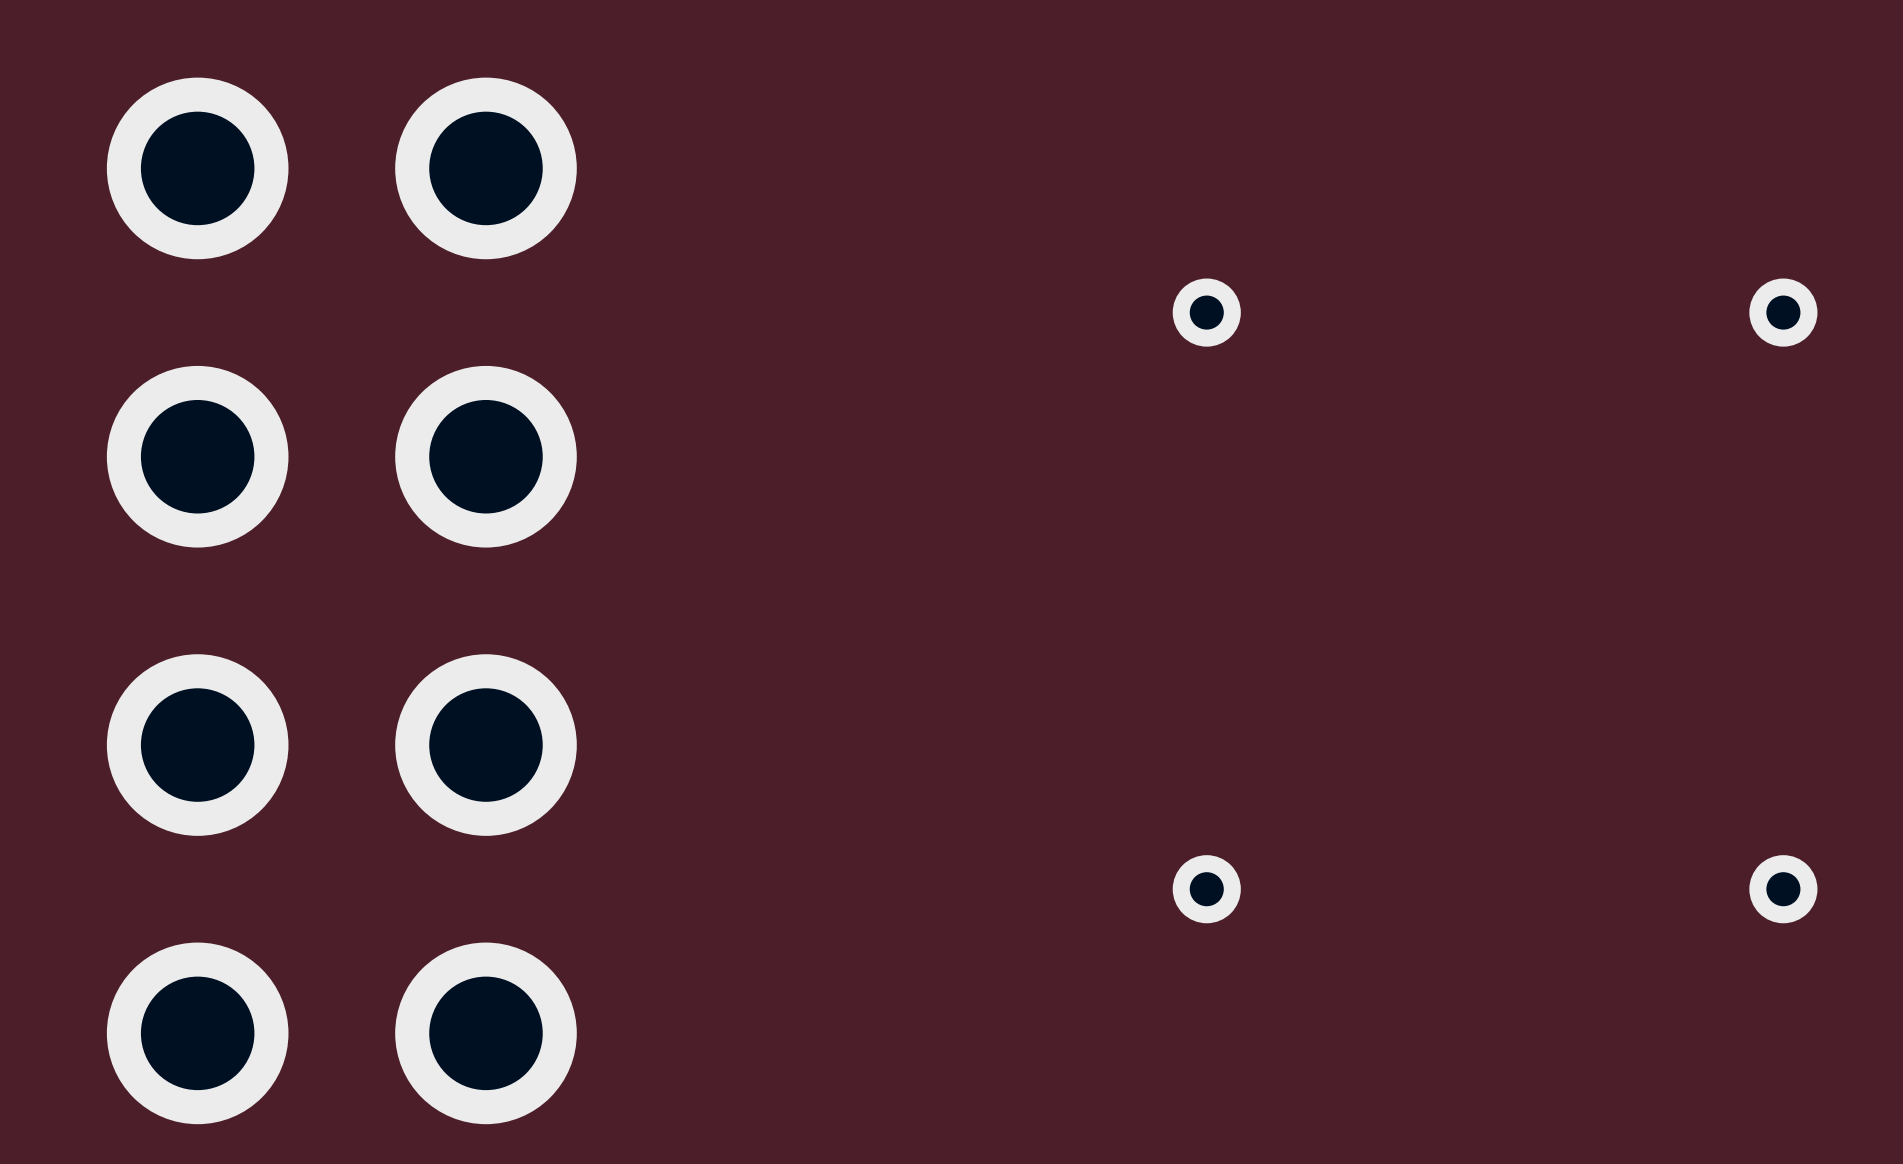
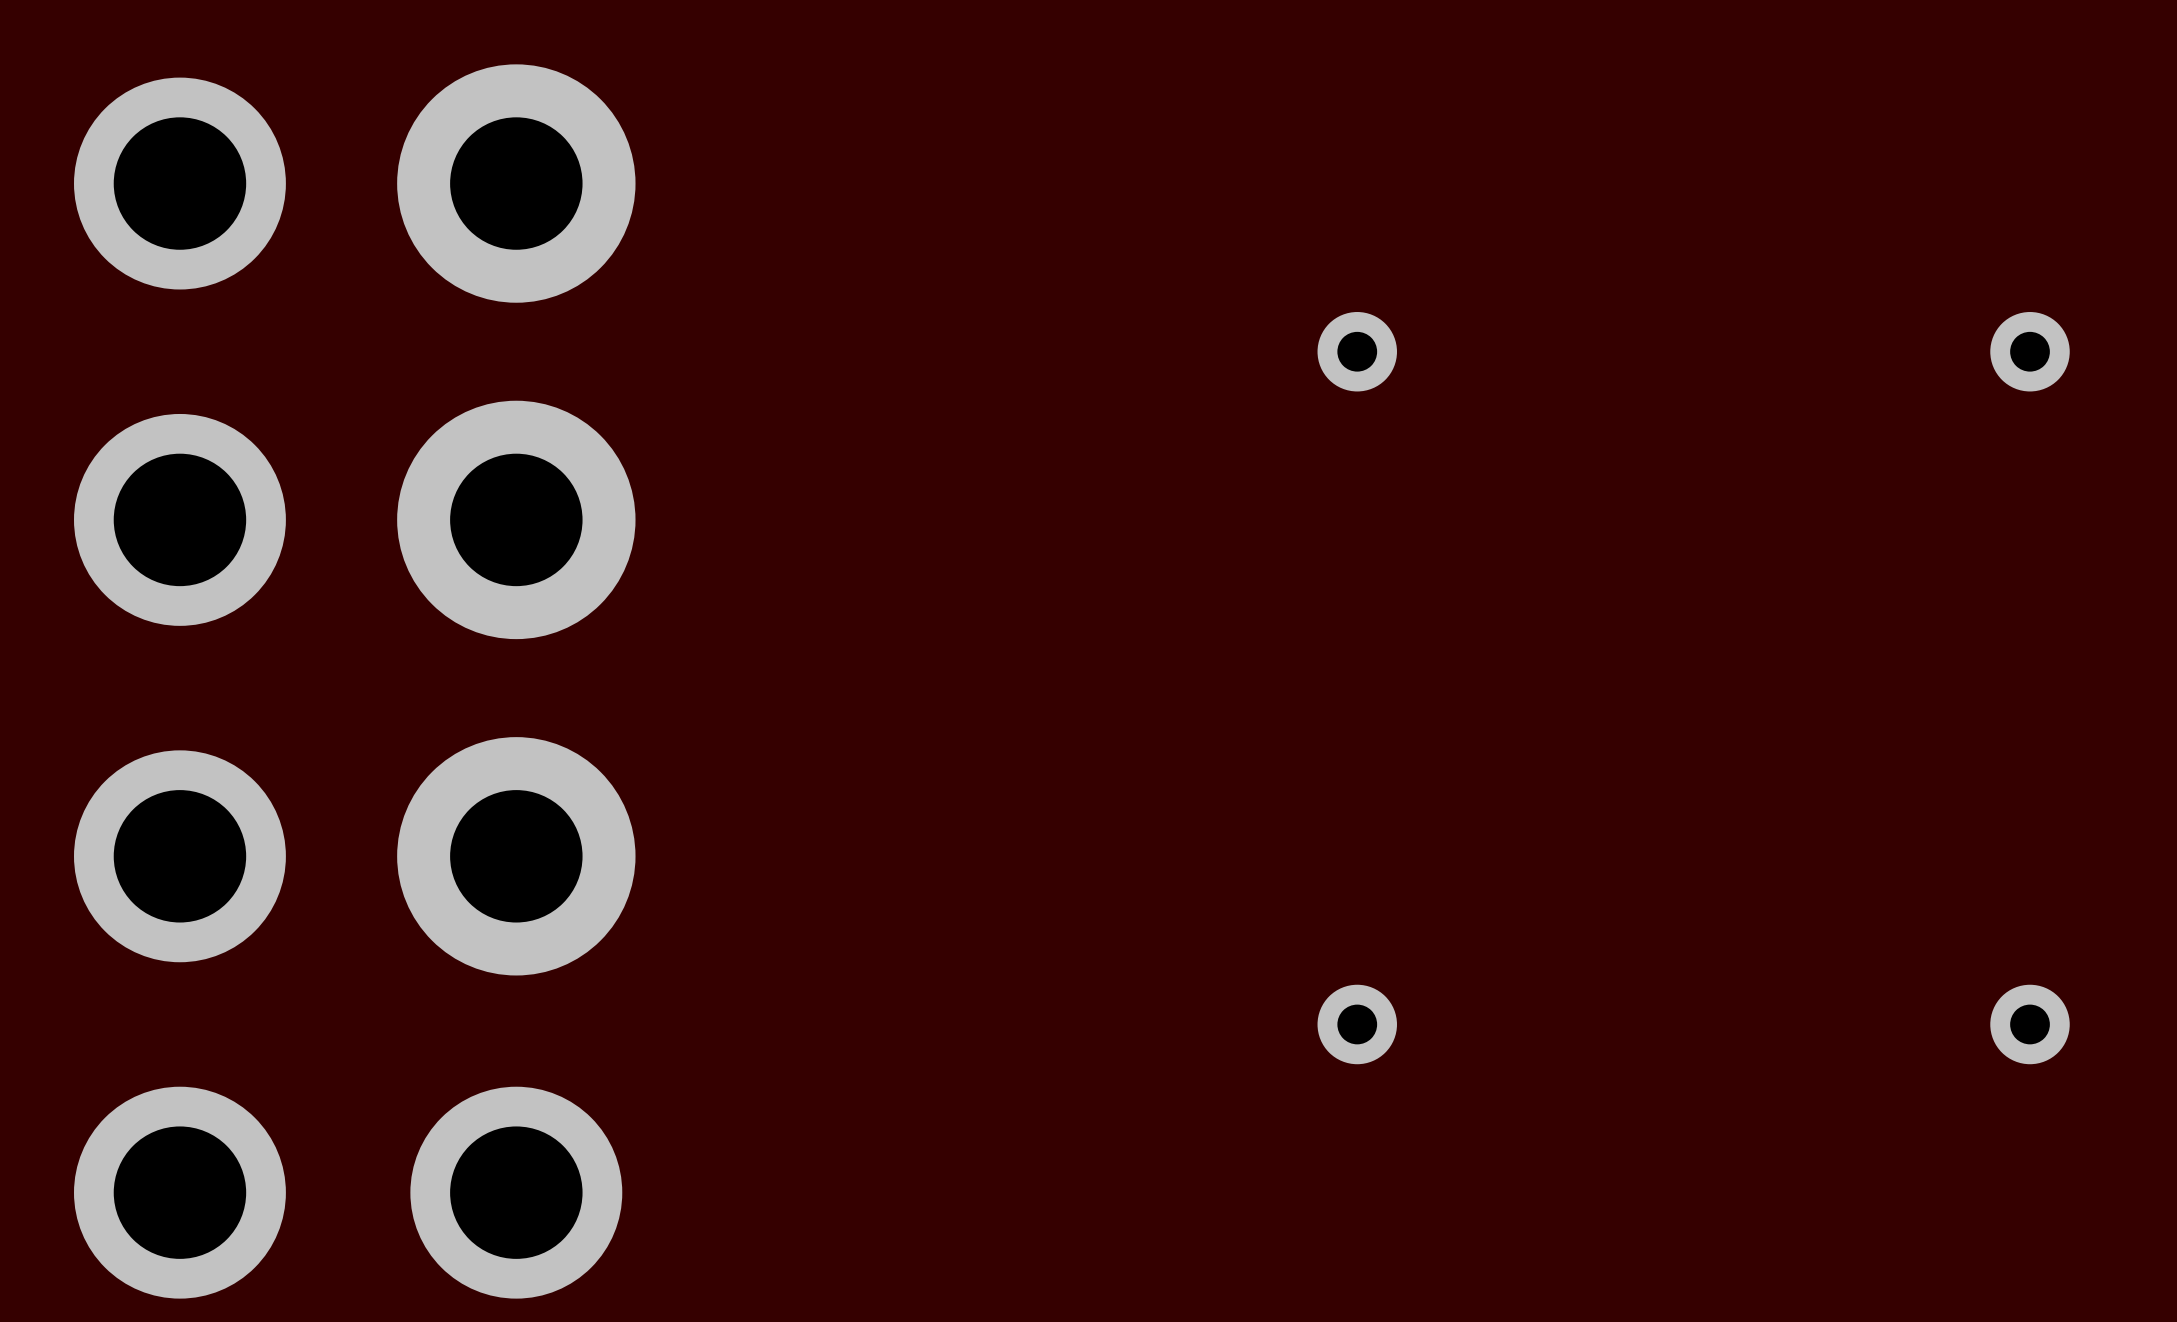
via size: [395, 77, 577, 260] -> [397, 64, 636, 303]
via size: [395, 365, 577, 548] -> [397, 400, 636, 640]
via size: [395, 654, 577, 836] -> [397, 737, 636, 976]

